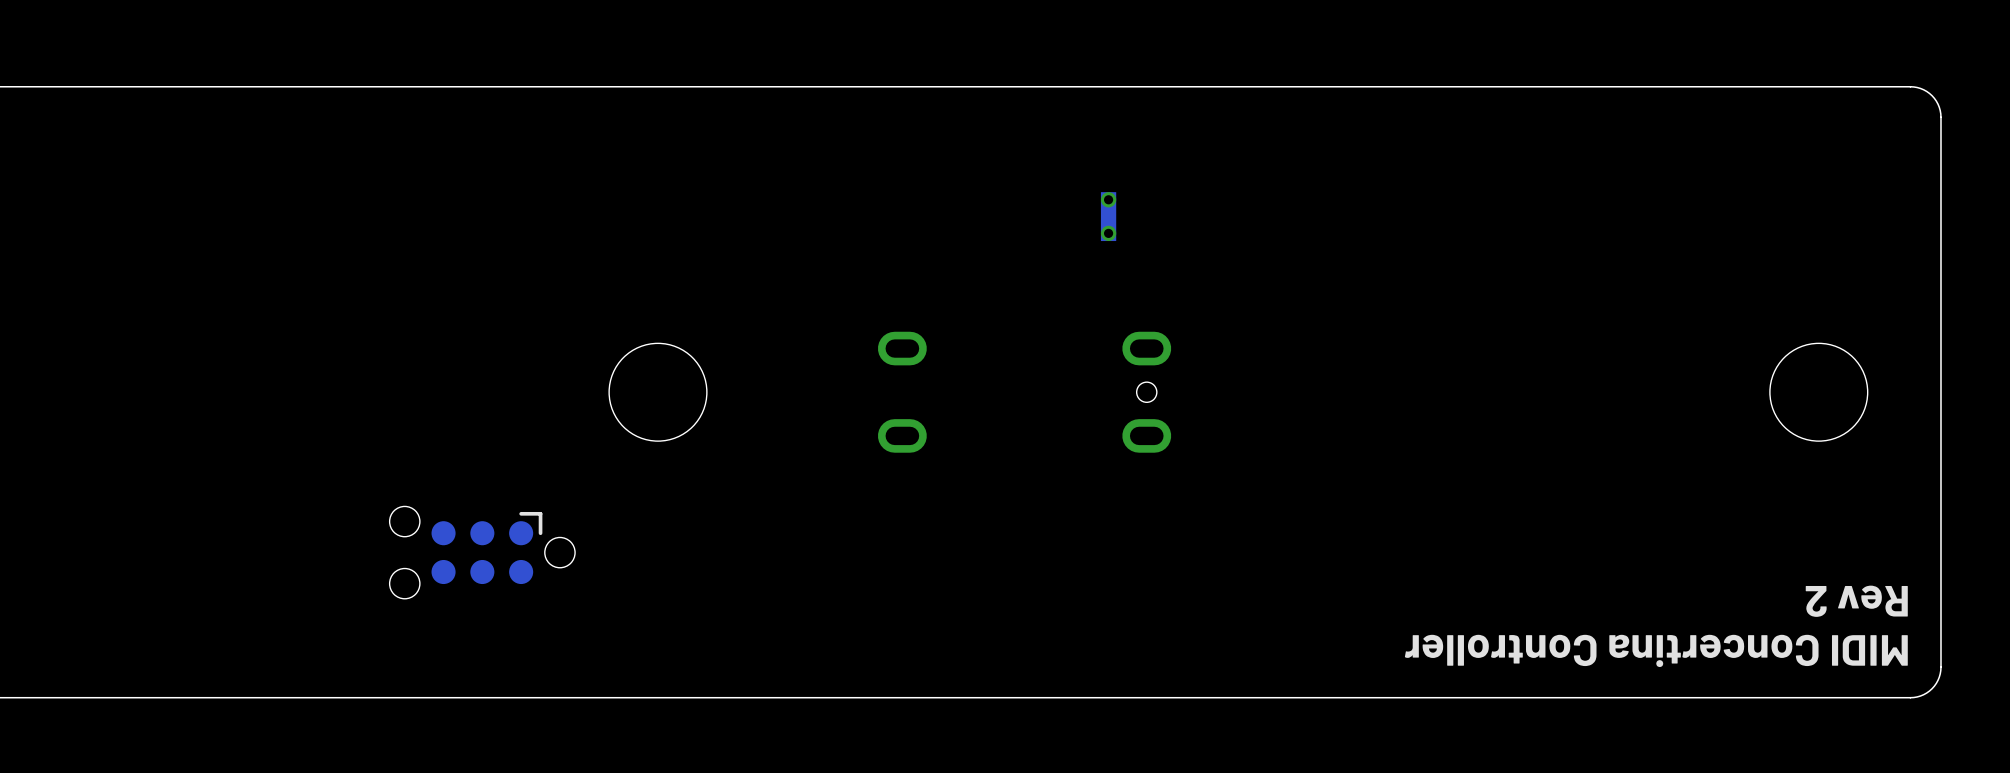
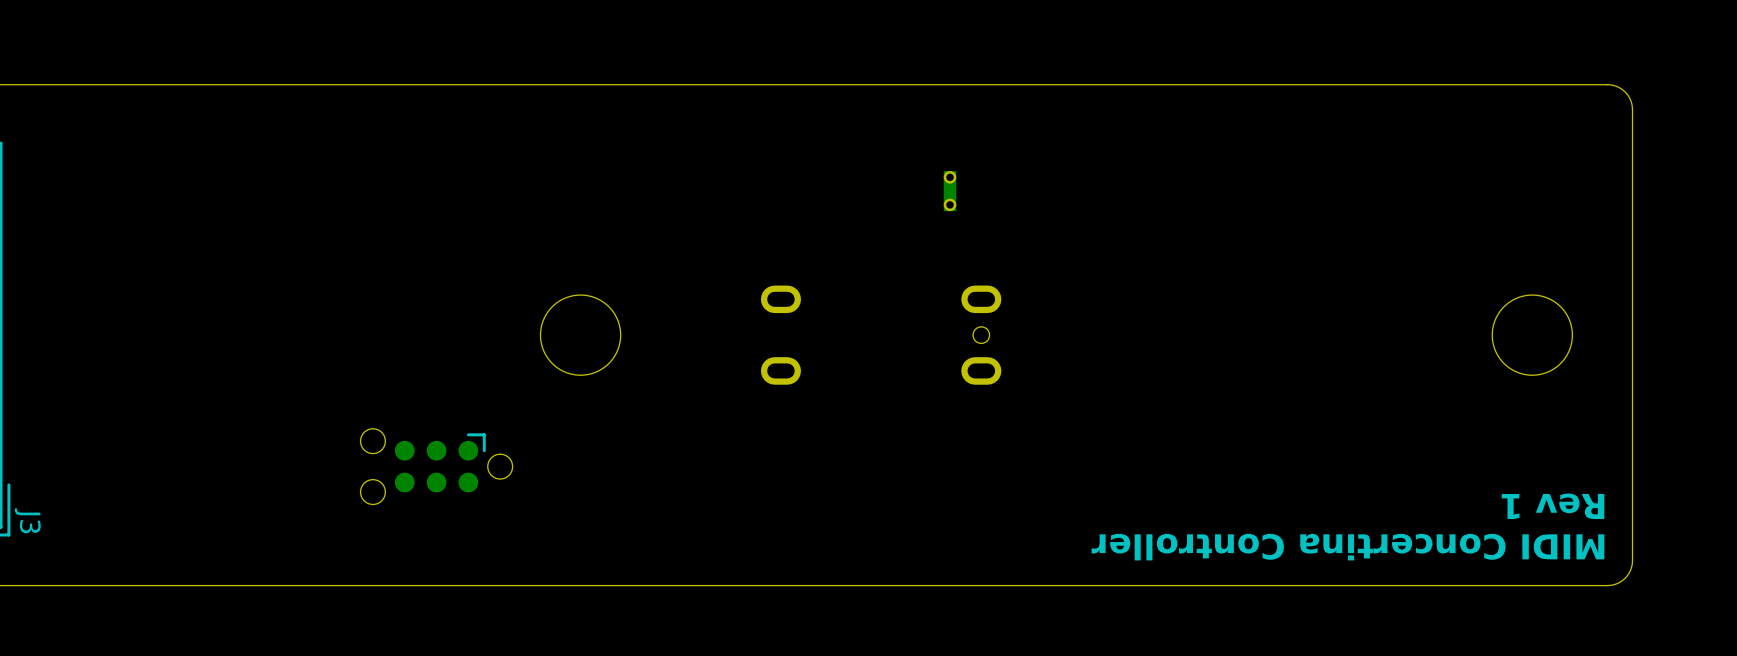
text: Rev 2 (1856, 601) -> Rev 1 (1553, 506)

